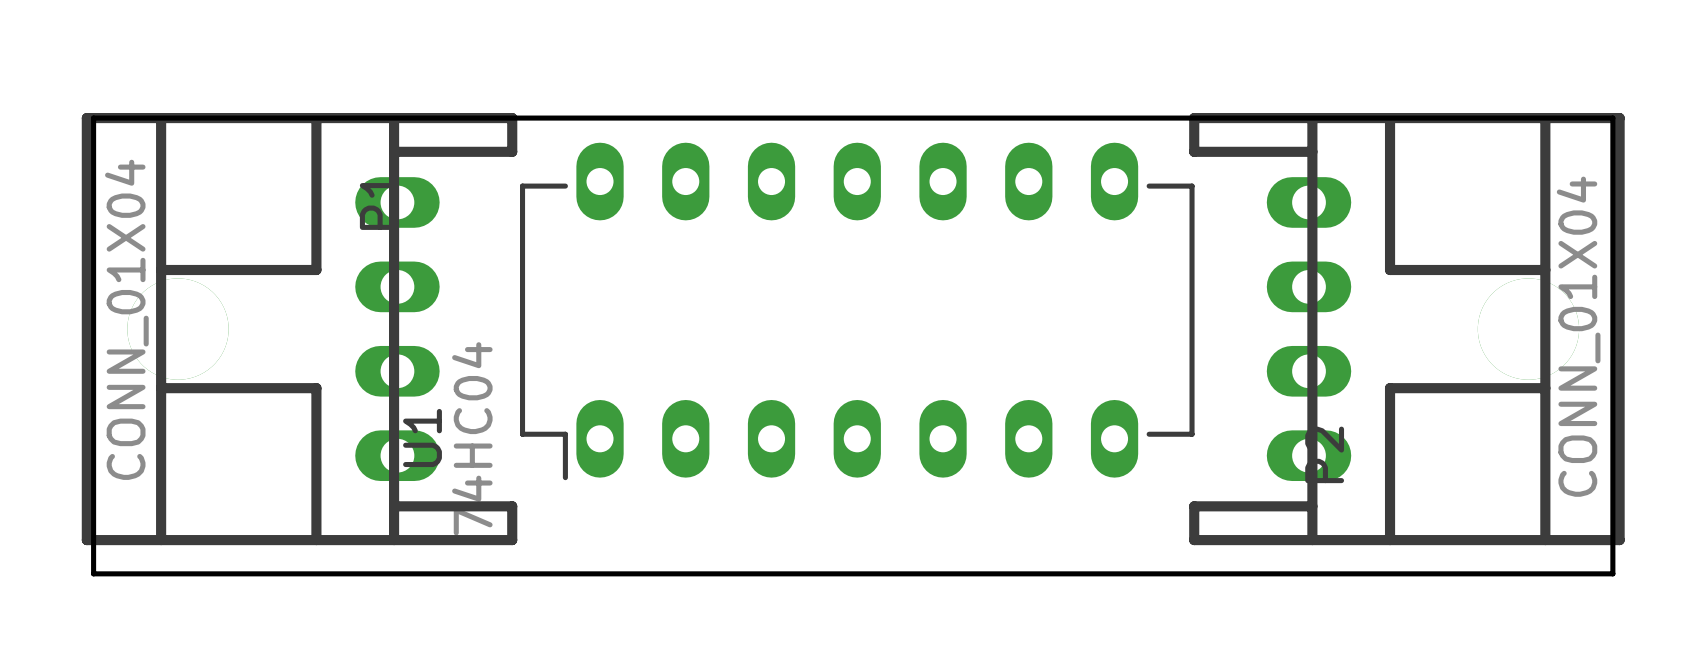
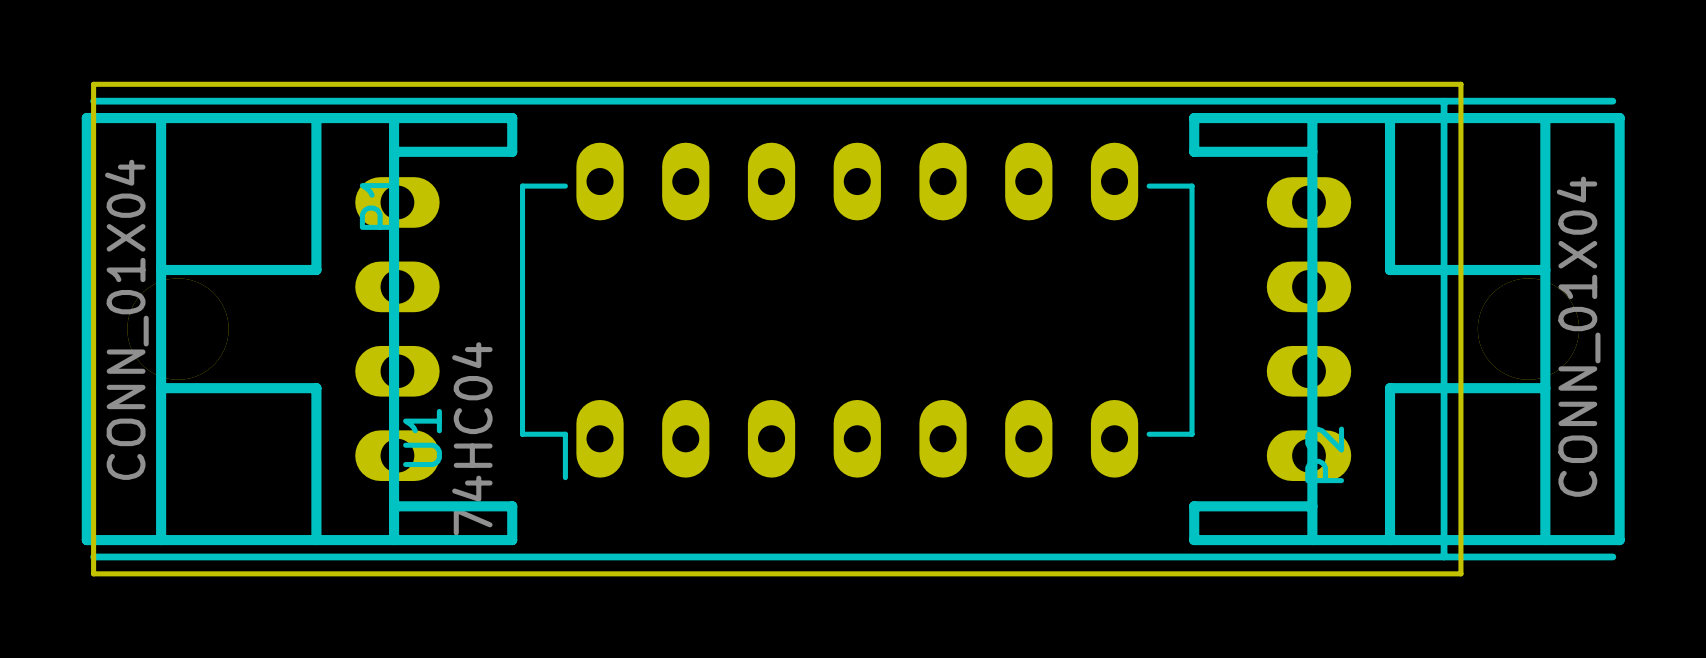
line: none -> (93, 101) (1612, 101)
line: none -> (1444, 101) (1444, 556)
board edge: (93, 118) (1612, 118) (1612, 573) (1460, 573) -> (93, 118) (93, 84) (1460, 84) (1460, 573)
line: none -> (93, 556) (1612, 556)

